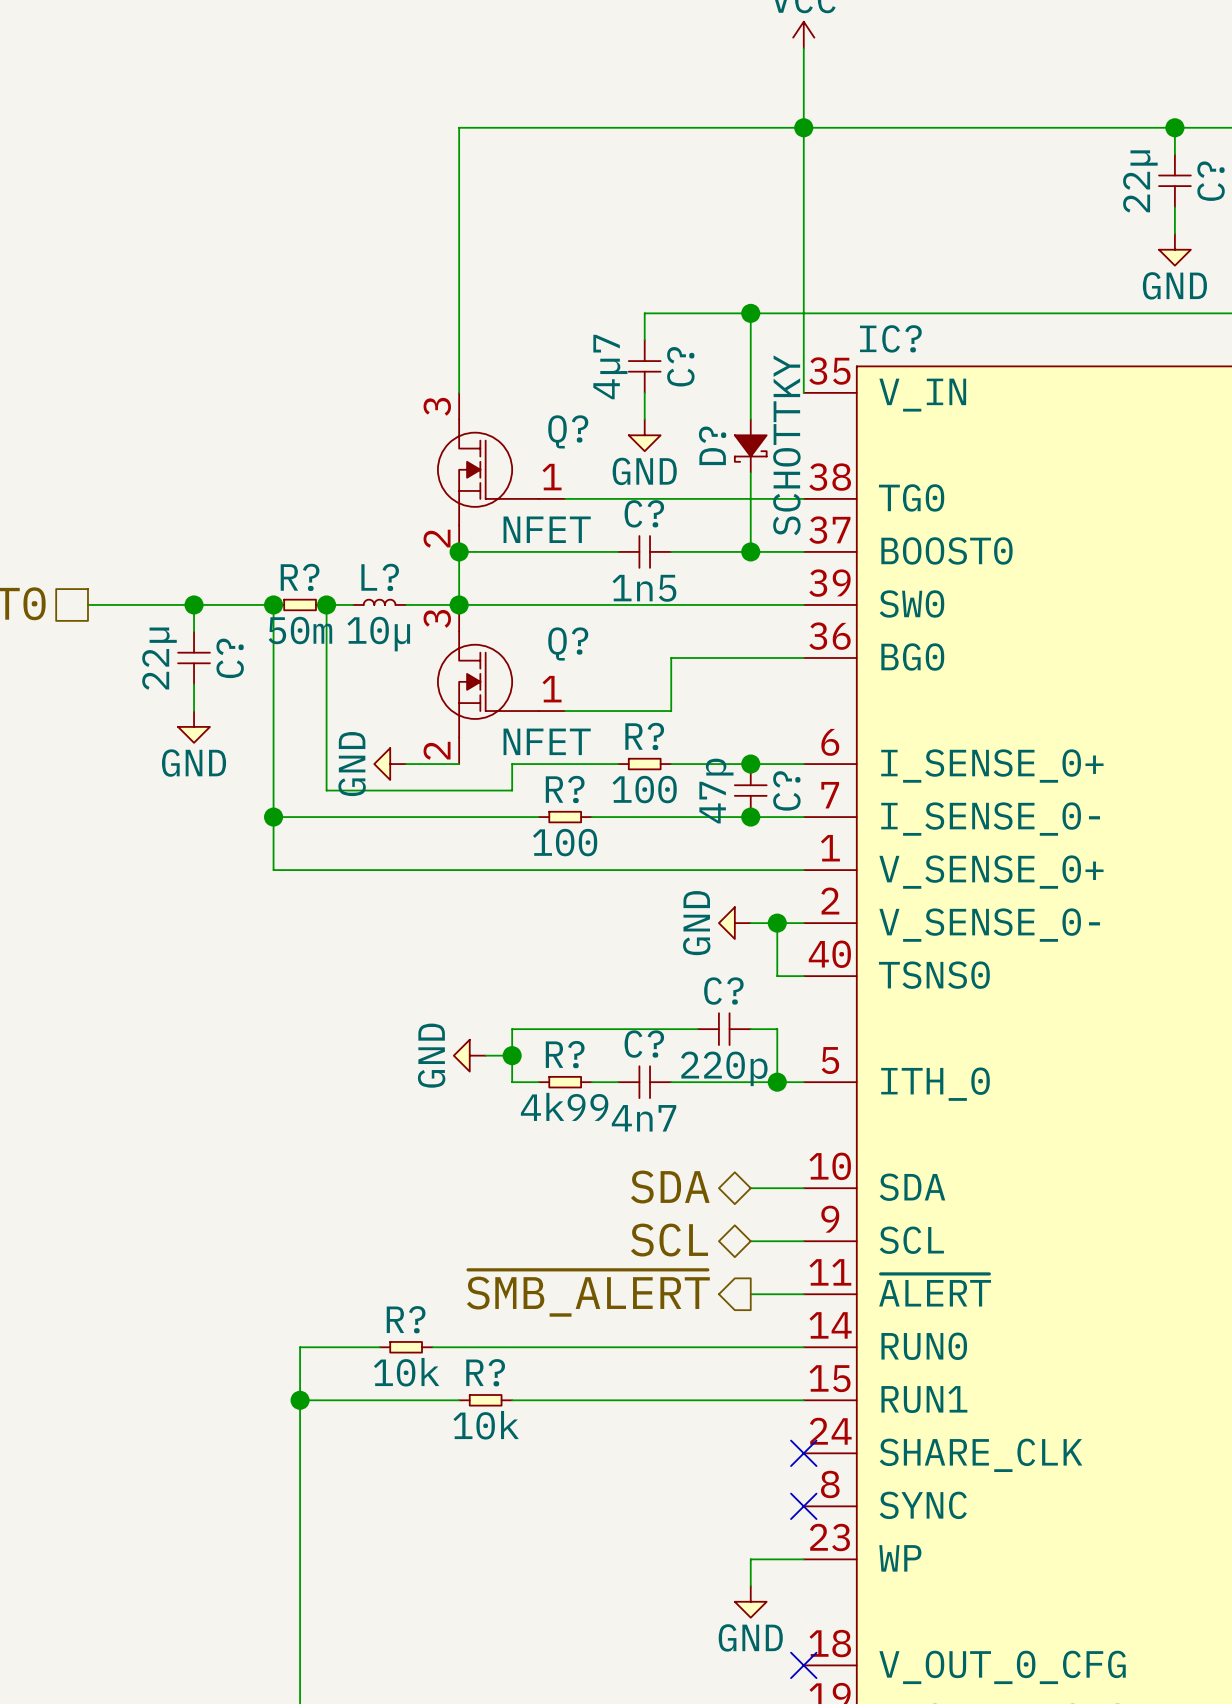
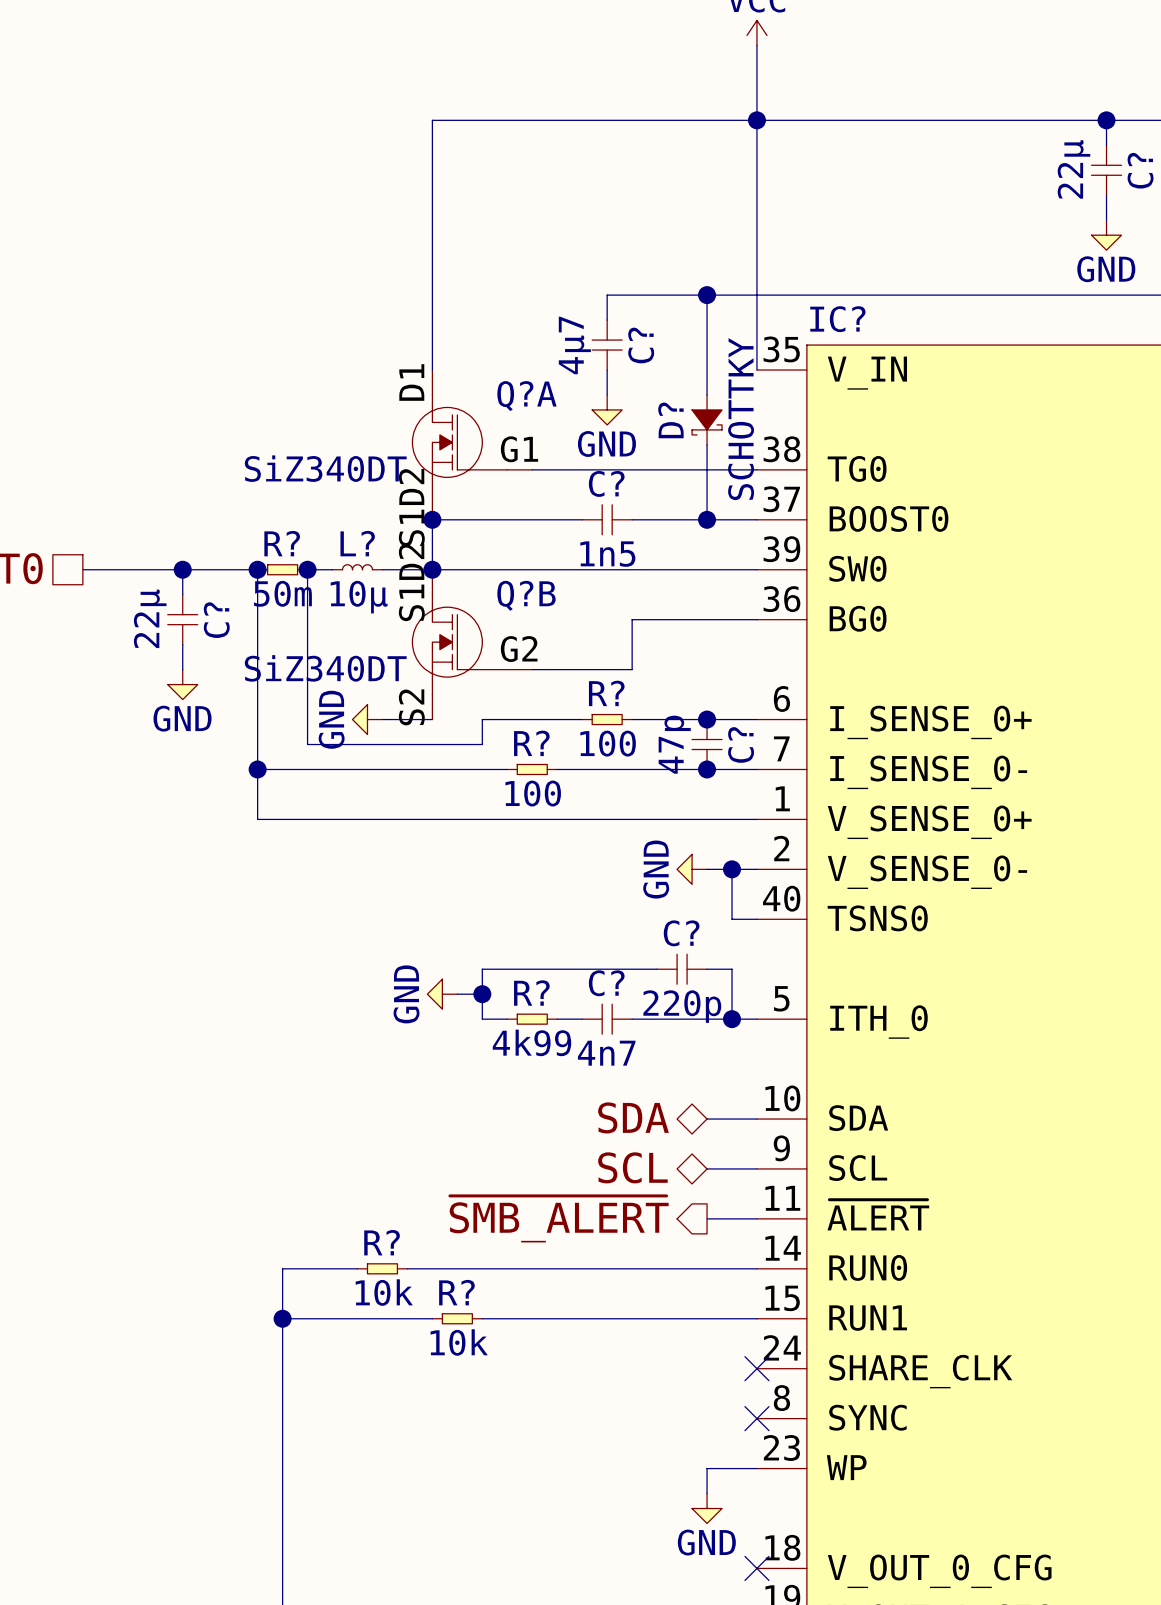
Q? pin number: 3 (437, 406) -> D1 (411, 382)
Q? name: Q? (568, 431) -> Q?A (526, 396)
Q? pin number: 1 (552, 477) -> G1 (519, 449)
Q? value: NFET (547, 529) -> SiZ340DT (325, 468)
Q? pin number: 2 (437, 538) -> S1D2 (411, 507)
Q? pin number: 3 (437, 618) -> S1D2 (411, 582)
Q? name: Q? (568, 643) -> Q?B (526, 595)
Q? pin number: 1 (552, 689) -> G2 (519, 649)
Q? value: NFET (547, 741) -> SiZ340DT (325, 668)
Q? pin number: 2 (437, 750) -> S2 (411, 707)

